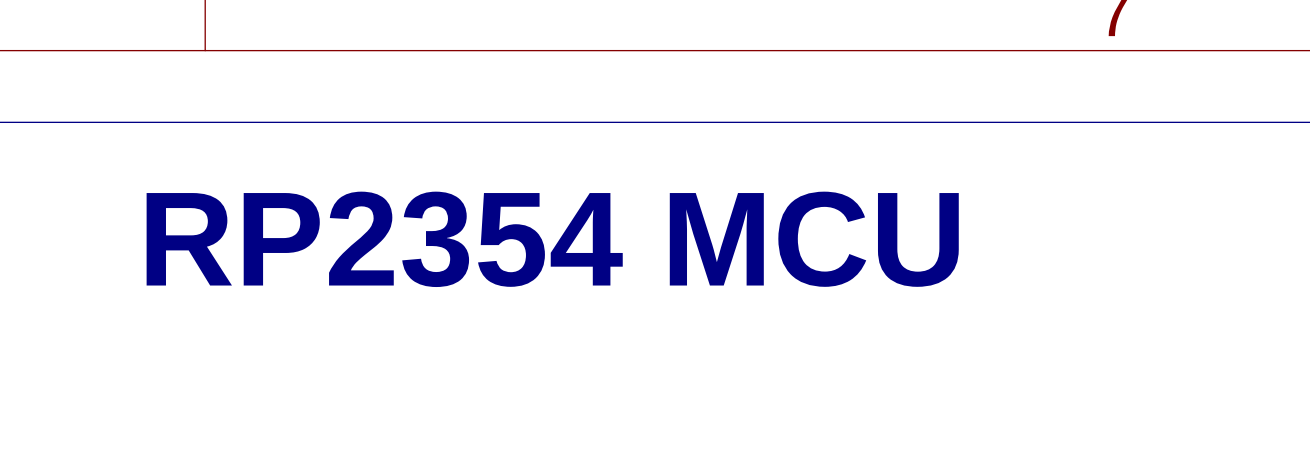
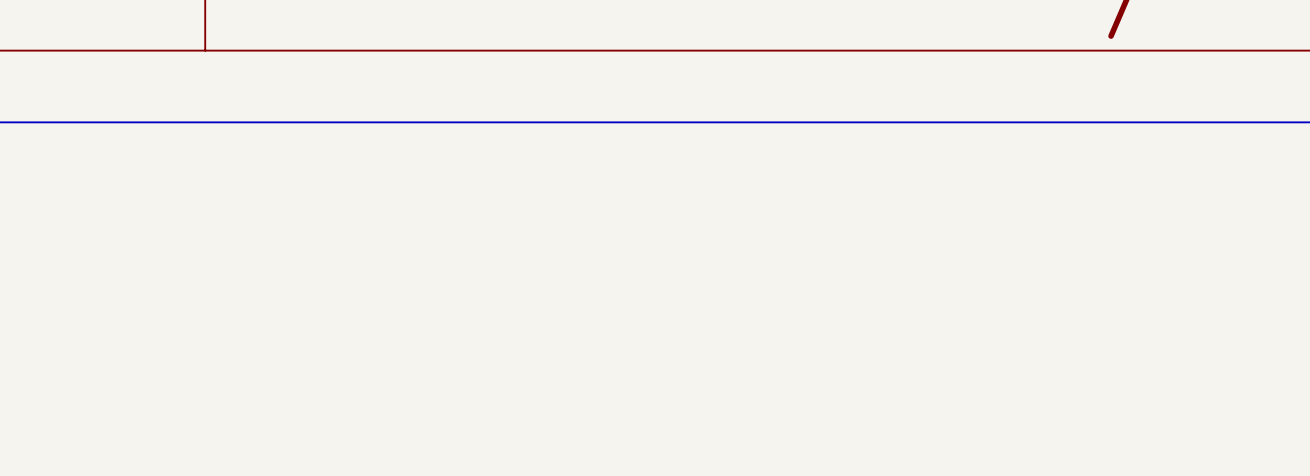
text: RP2354 MCU (552, 239) -> none

